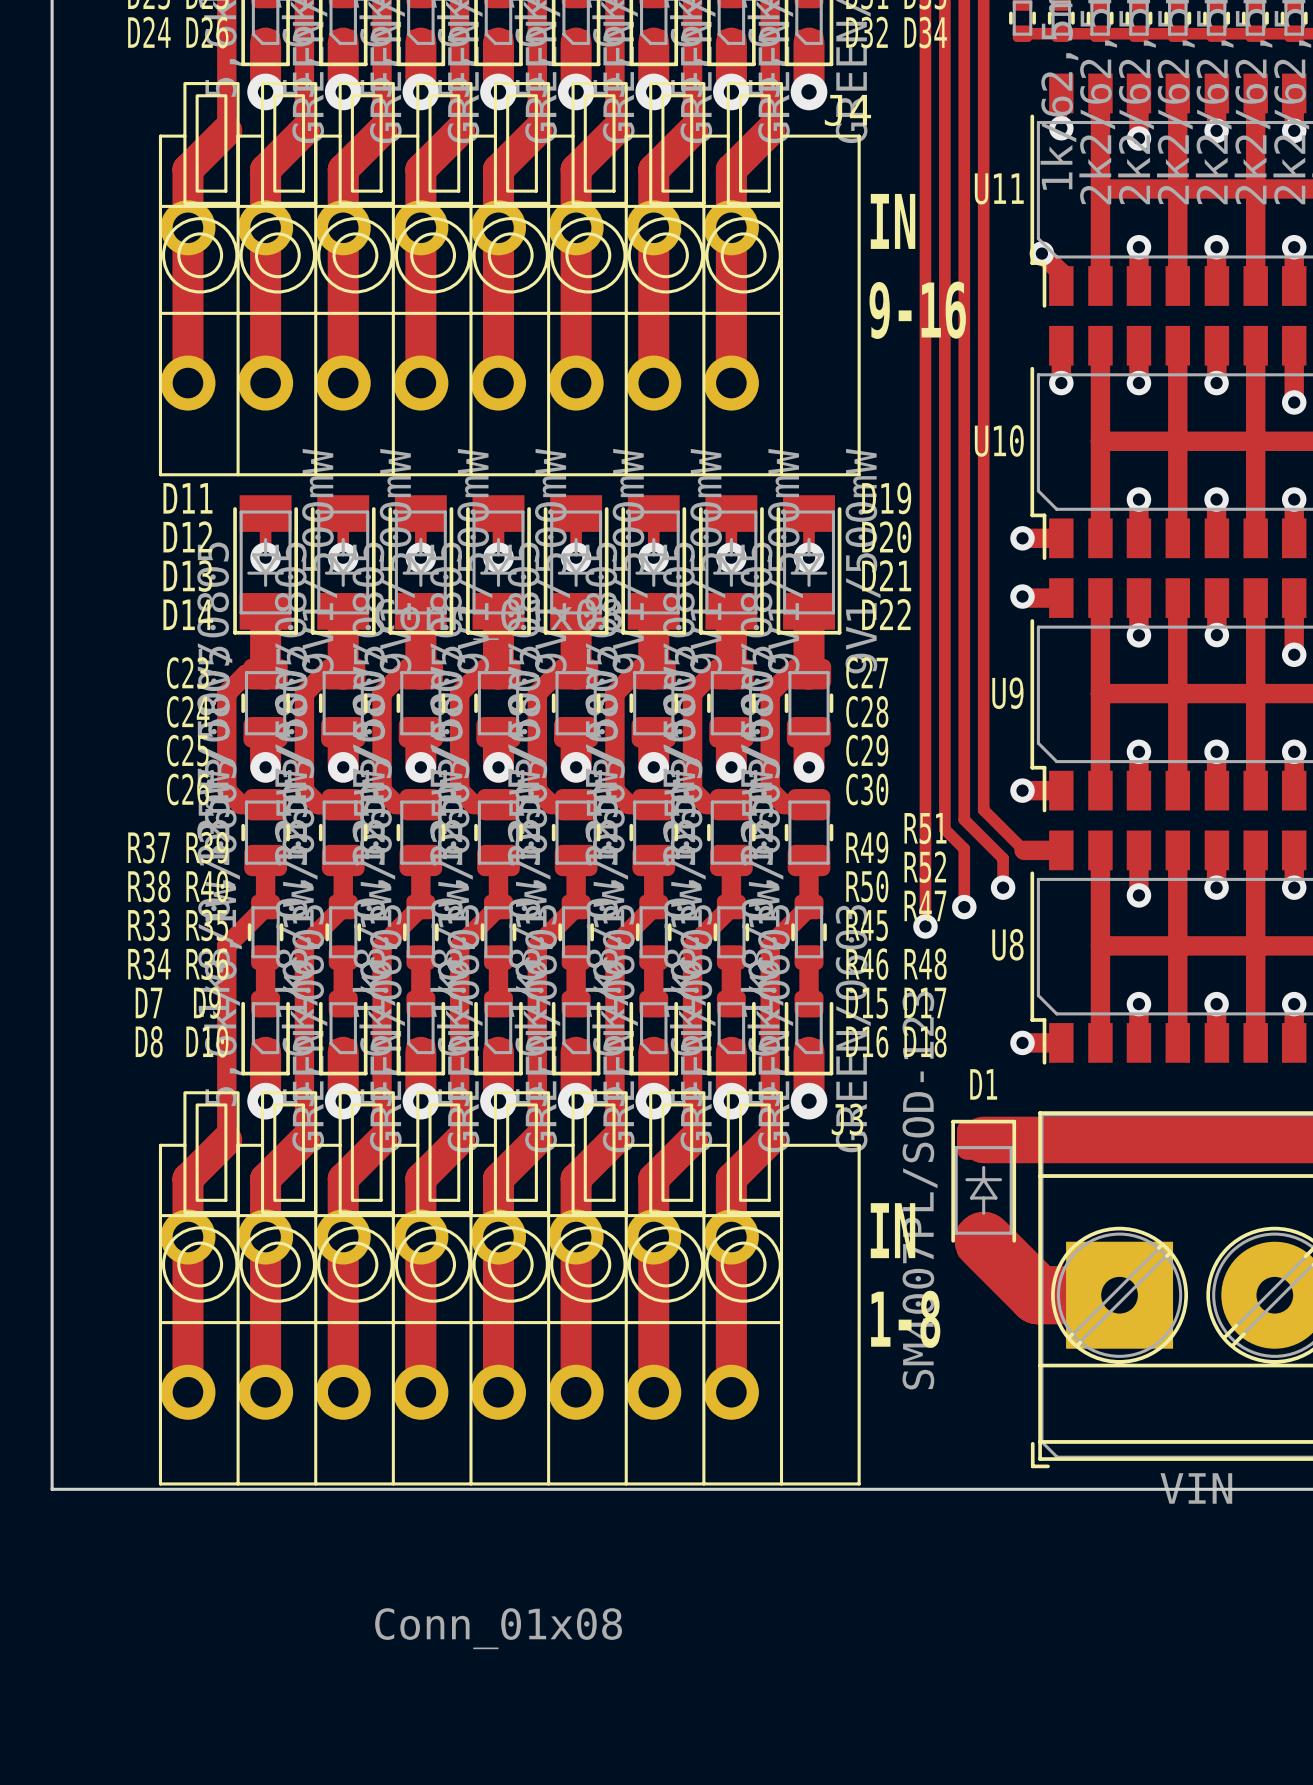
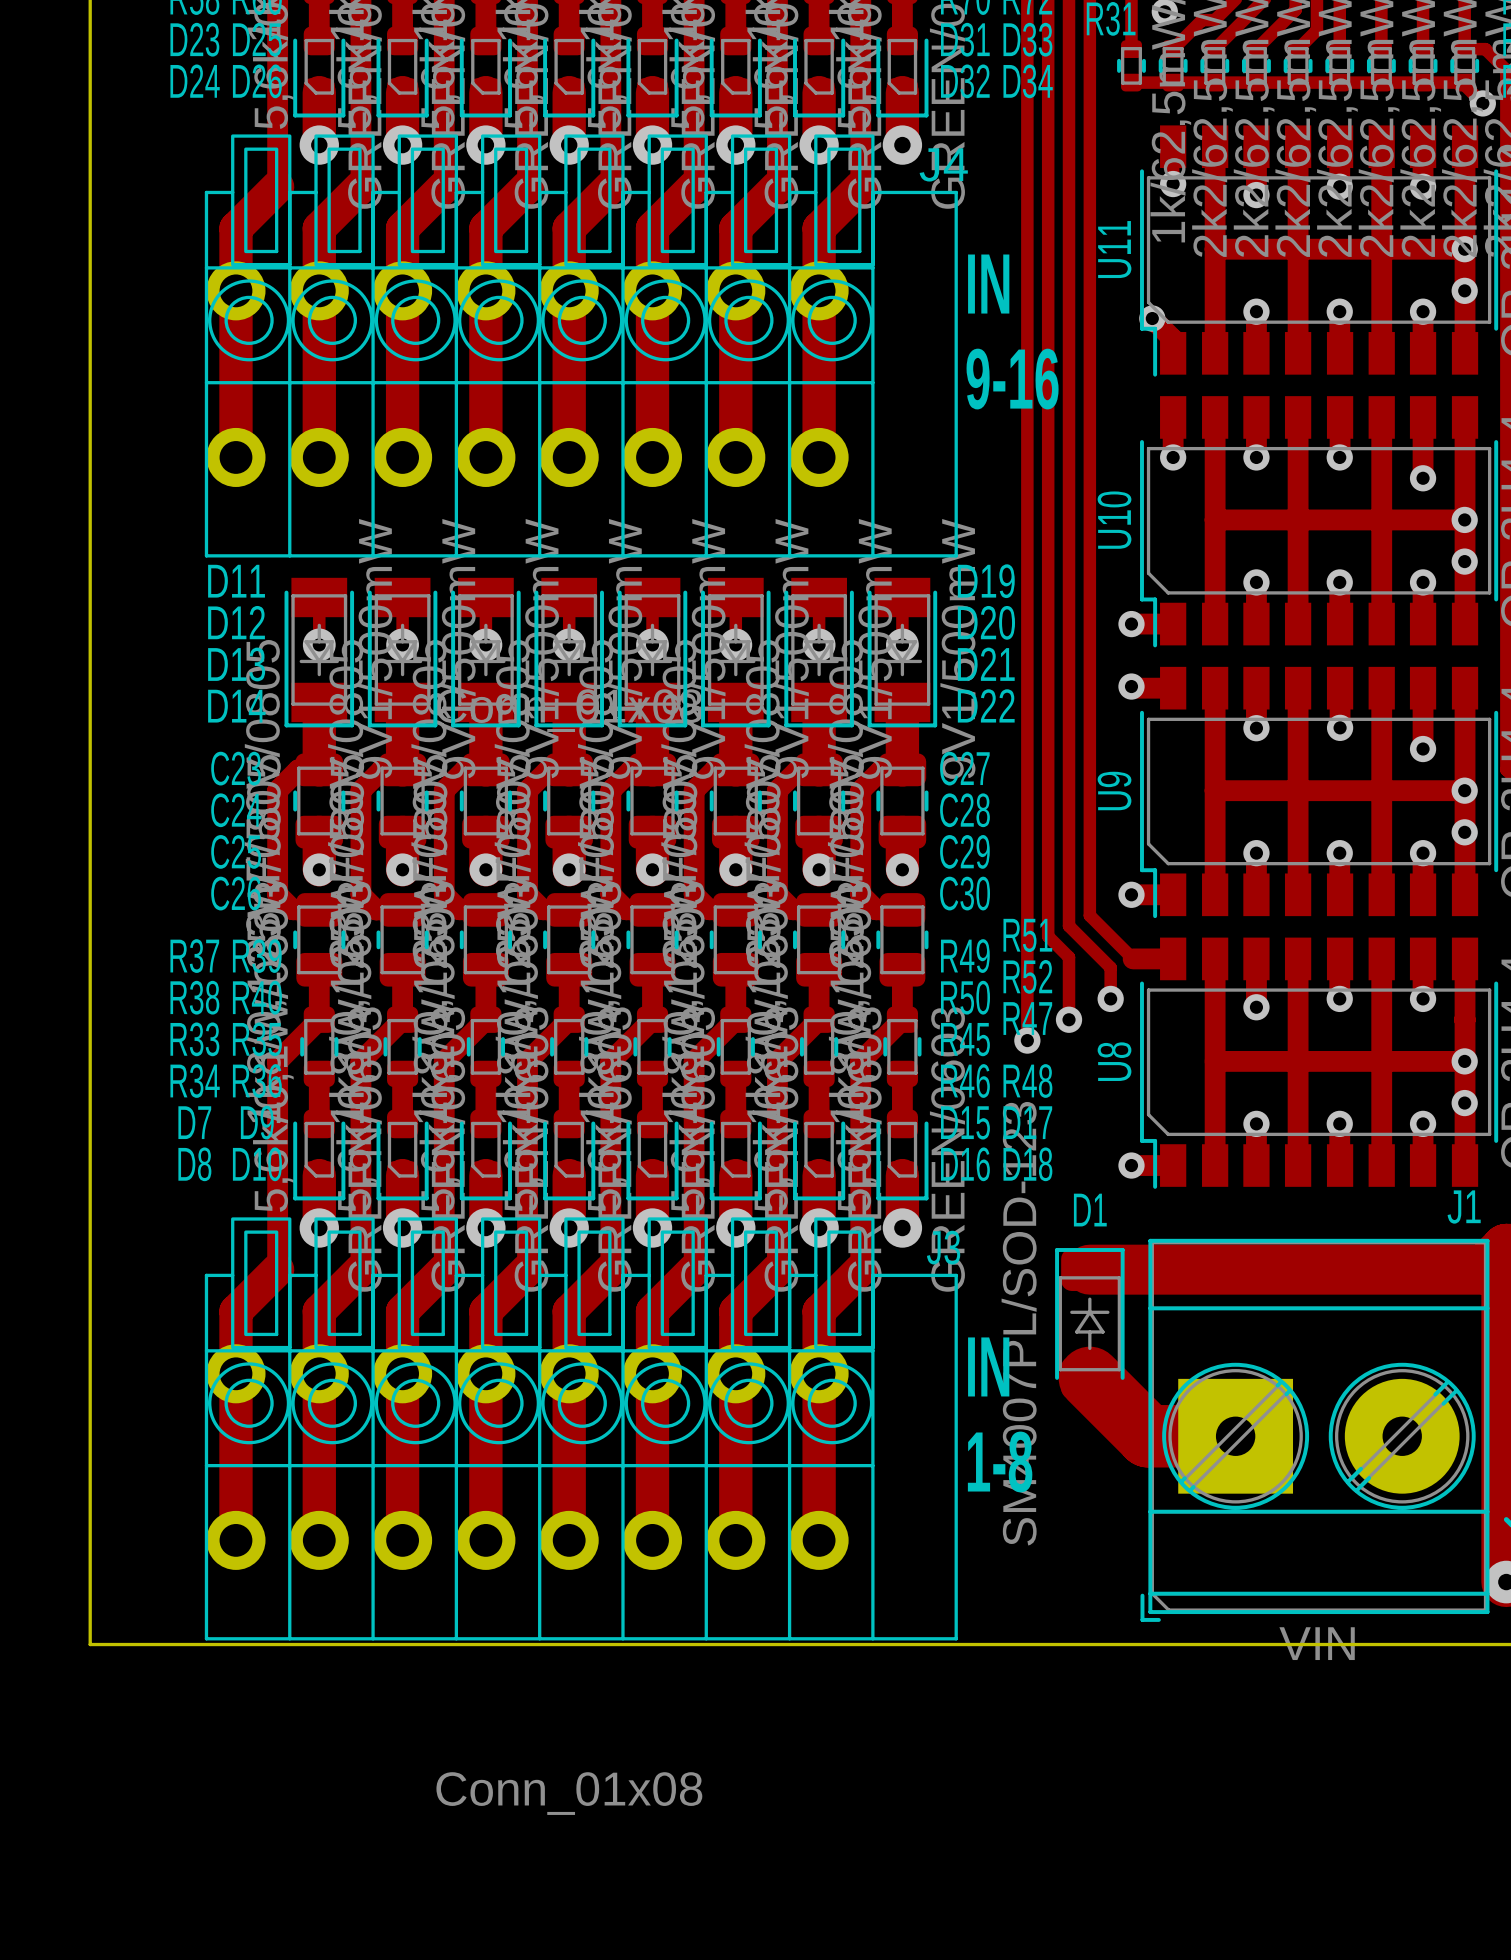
U11 name rotation: 0° (999, 188) -> 90° counterclockwise (1114, 249)
U10 name rotation: 0° (999, 440) -> 90° counterclockwise (1114, 520)
U9 name rotation: 0° (1007, 693) -> 90° counterclockwise (1114, 790)
U8 name rotation: 0° (1007, 944) -> 90° counterclockwise (1114, 1061)

